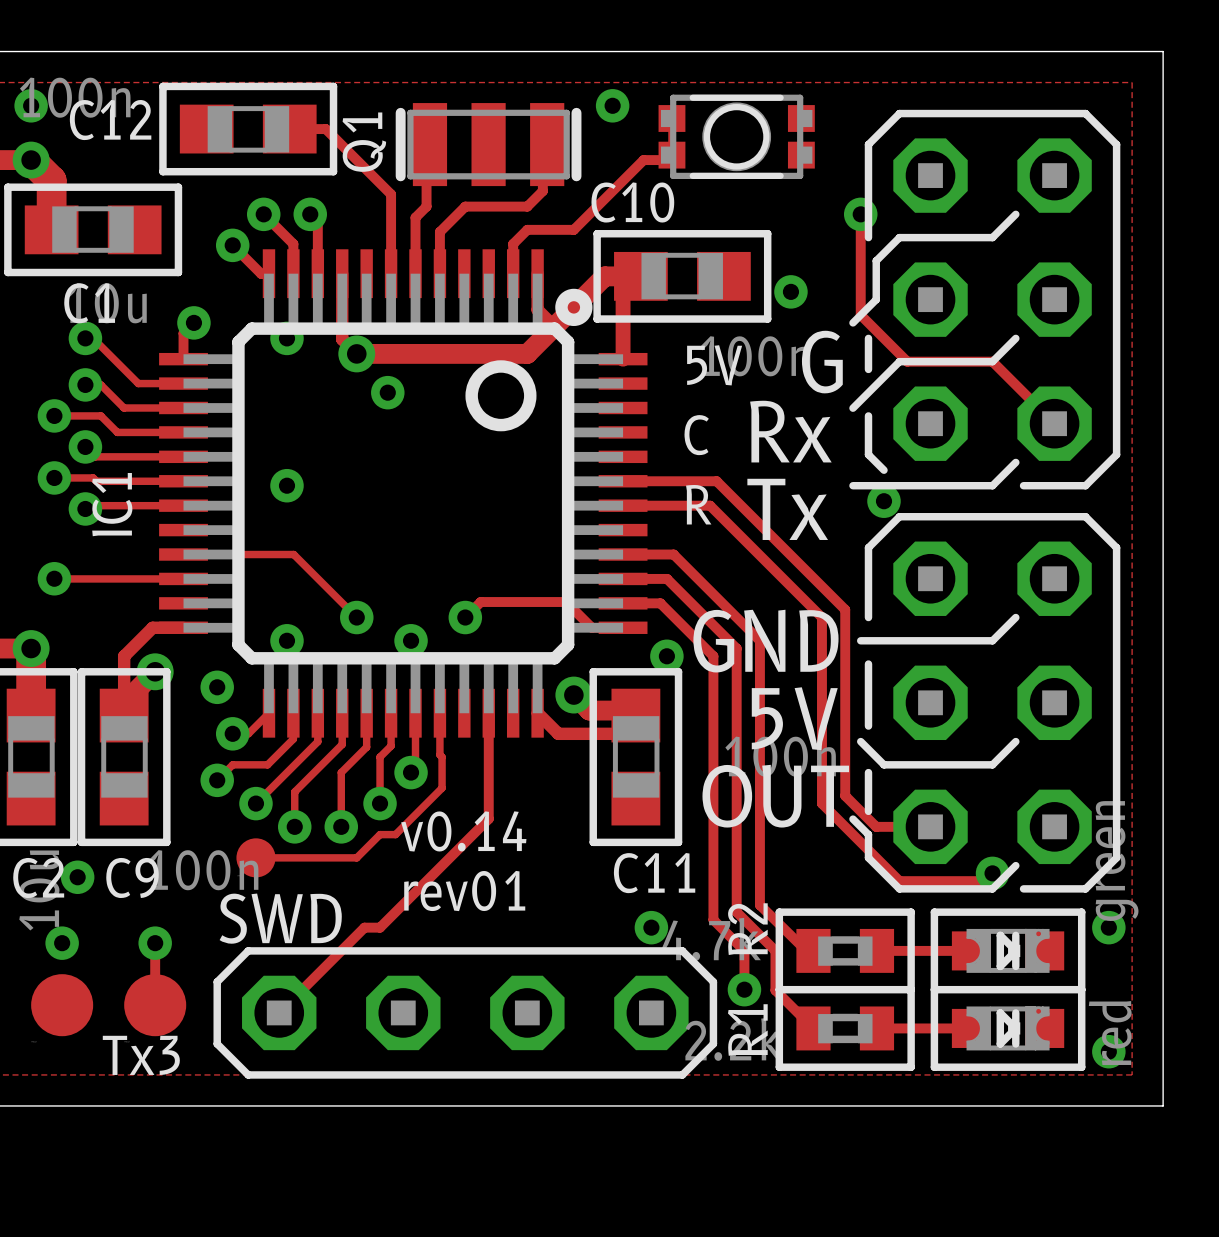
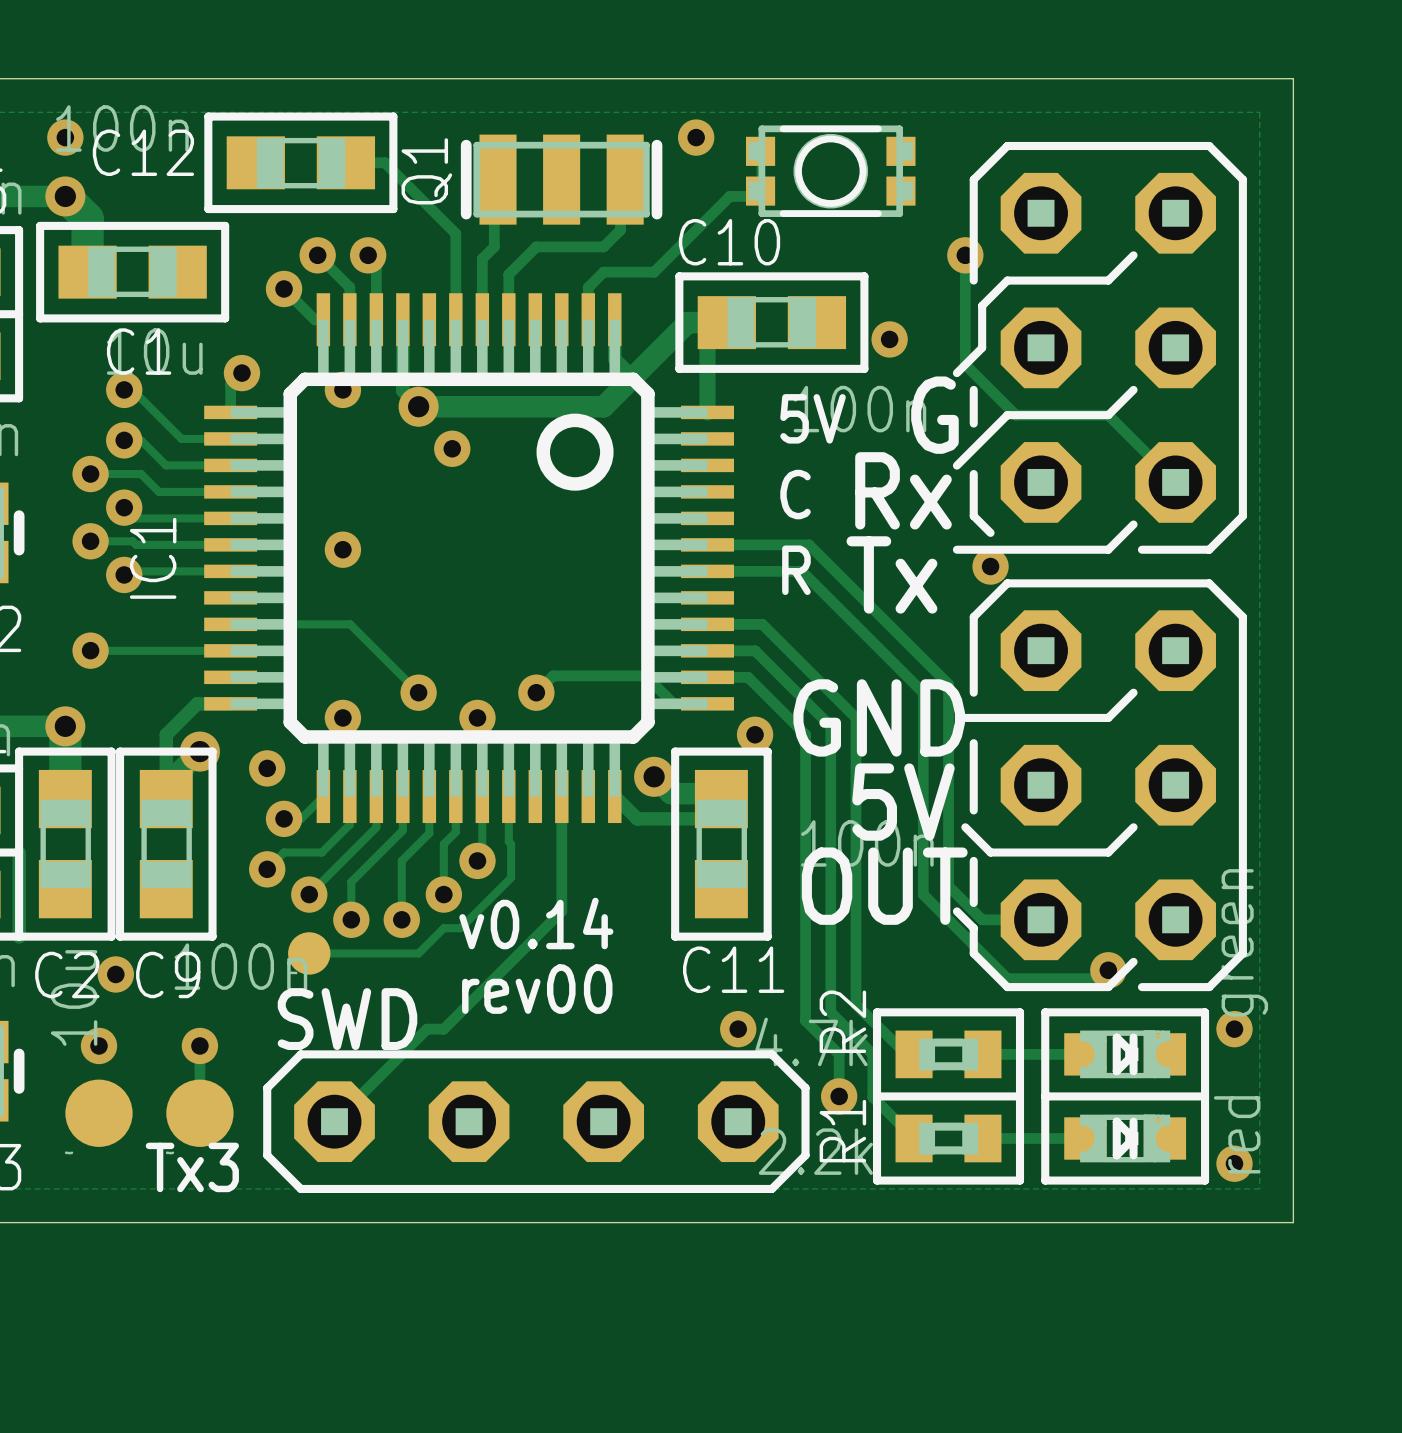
drawing: [555, 288, 593, 327] -> none
text: rev01 (464, 891) -> rev00 (537, 989)

